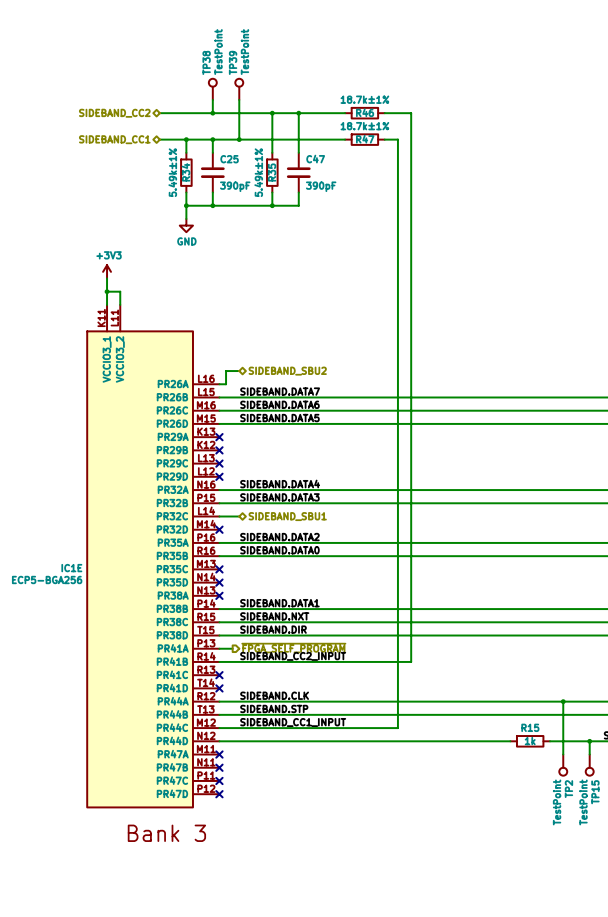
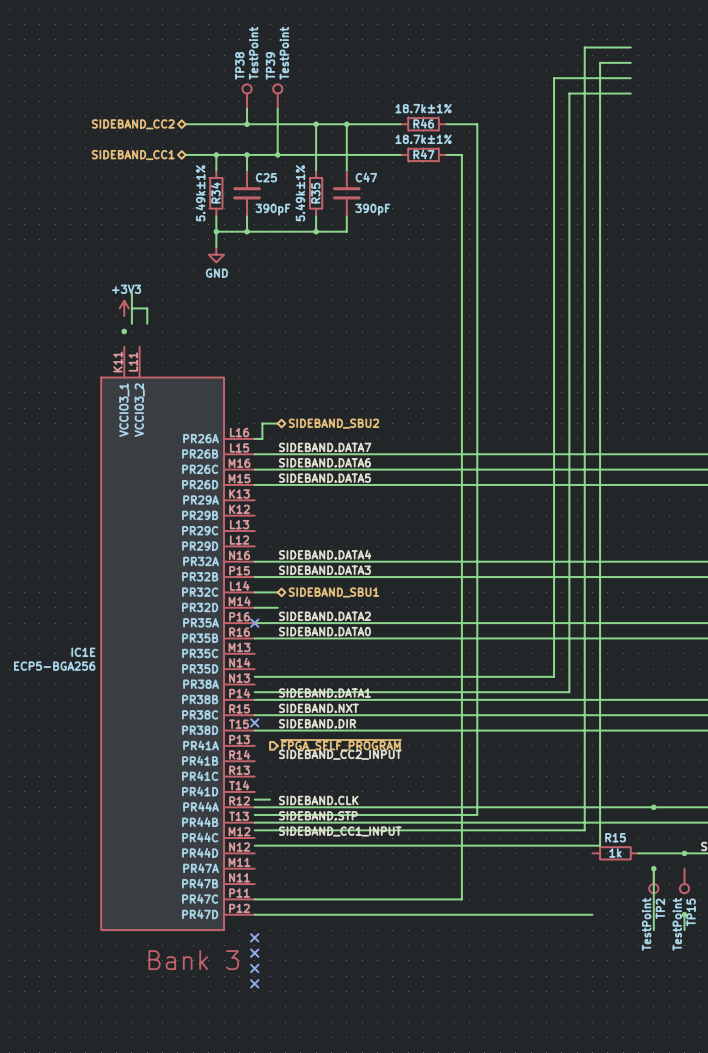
wire: none -> (630, 47) (584, 47) (584, 830) (254, 830)
wire: none -> (630, 62) (600, 62) (600, 845) (254, 845)
wire: none -> (630, 78) (554, 78) (554, 676) (254, 676)
wire: none -> (630, 93) (569, 93) (569, 692) (254, 692)
wire: (107, 278) (107, 304) -> (131, 293) (131, 323)
wire: (107, 291) (120, 291) (120, 304) -> (131, 308) (147, 308) (147, 323)
no-connect mark: (219, 437) -> none
no-connect mark: (219, 450) -> none
no-connect mark: (219, 463) -> none
no-connect mark: (219, 476) -> none
wire: none -> (254, 607) (277, 607)
no-connect mark: (219, 529) -> none
no-connect mark: none -> (254, 623)
no-connect mark: (219, 569) -> none
no-connect mark: (219, 582) -> none
no-connect mark: (219, 595) -> none
no-connect mark: none -> (254, 722)
wire: (219, 648) (232, 648) -> (254, 799) (270, 799)
wire: (219, 661) (411, 661) -> (254, 814) (477, 814) (477, 761)
no-connect mark: (219, 675) -> none
no-connect mark: (219, 688) -> none
wire: (563, 701) (563, 754) -> (653, 930) (653, 868)
wire: (219, 728) (397, 728) -> (254, 899) (461, 899) (461, 838)
wire: (219, 741) (510, 741) -> (254, 914) (592, 914)
wire: (589, 741) (589, 754) -> (684, 914) (684, 930)
no-connect mark: (219, 754) -> none
junction: none -> (653, 868)
no-connect mark: (219, 767) -> none
no-connect mark: (219, 780) -> none
no-connect mark: (219, 794) -> none
junction: none -> (684, 914)
no-connect mark: none -> (254, 937)
no-connect mark: none -> (254, 953)
no-connect mark: none -> (254, 968)
no-connect mark: none -> (254, 983)

